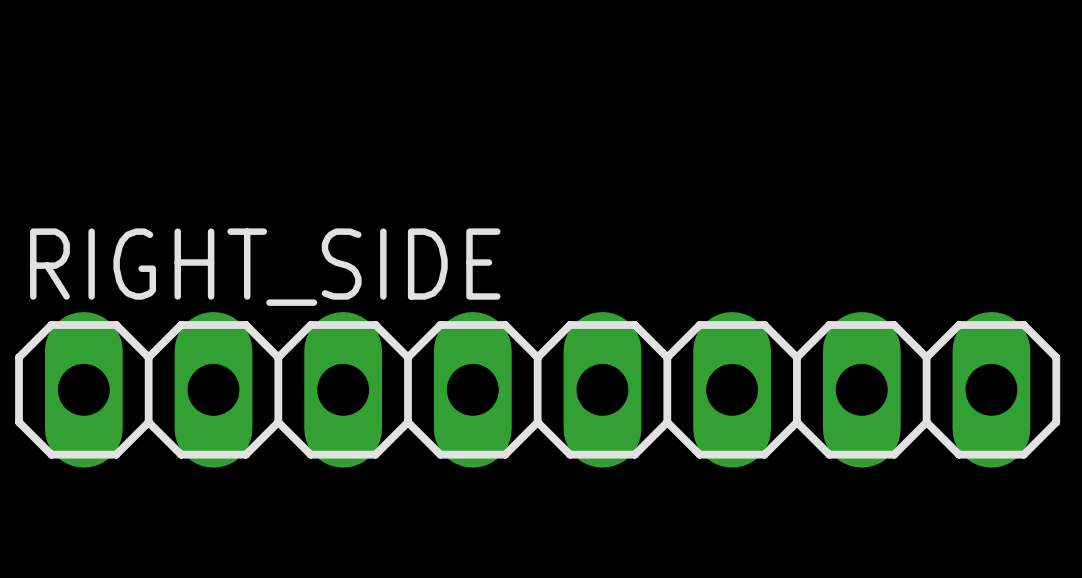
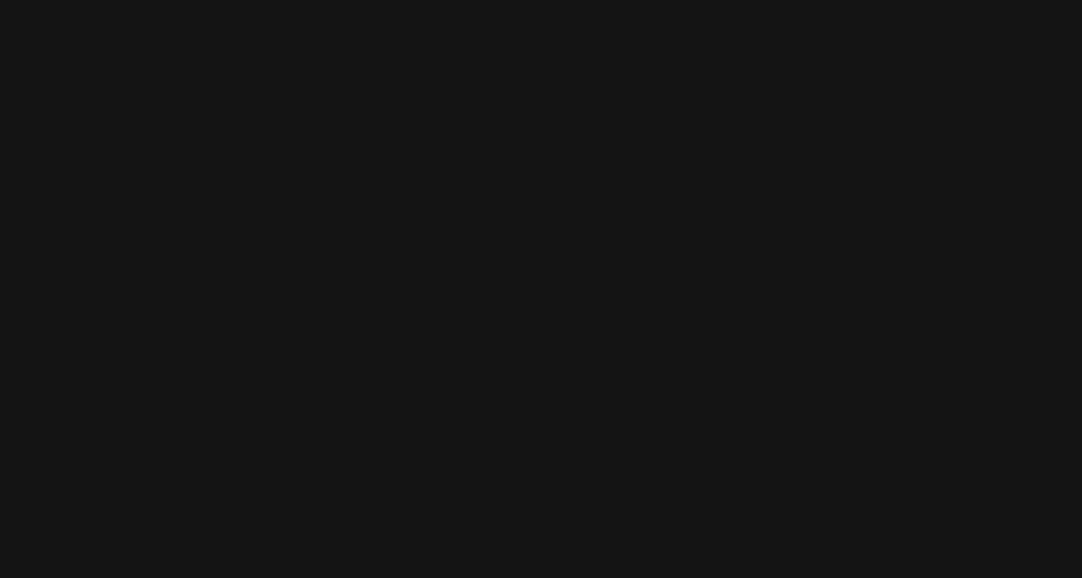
RIGHT_SIDE: (537, 389) -> none

